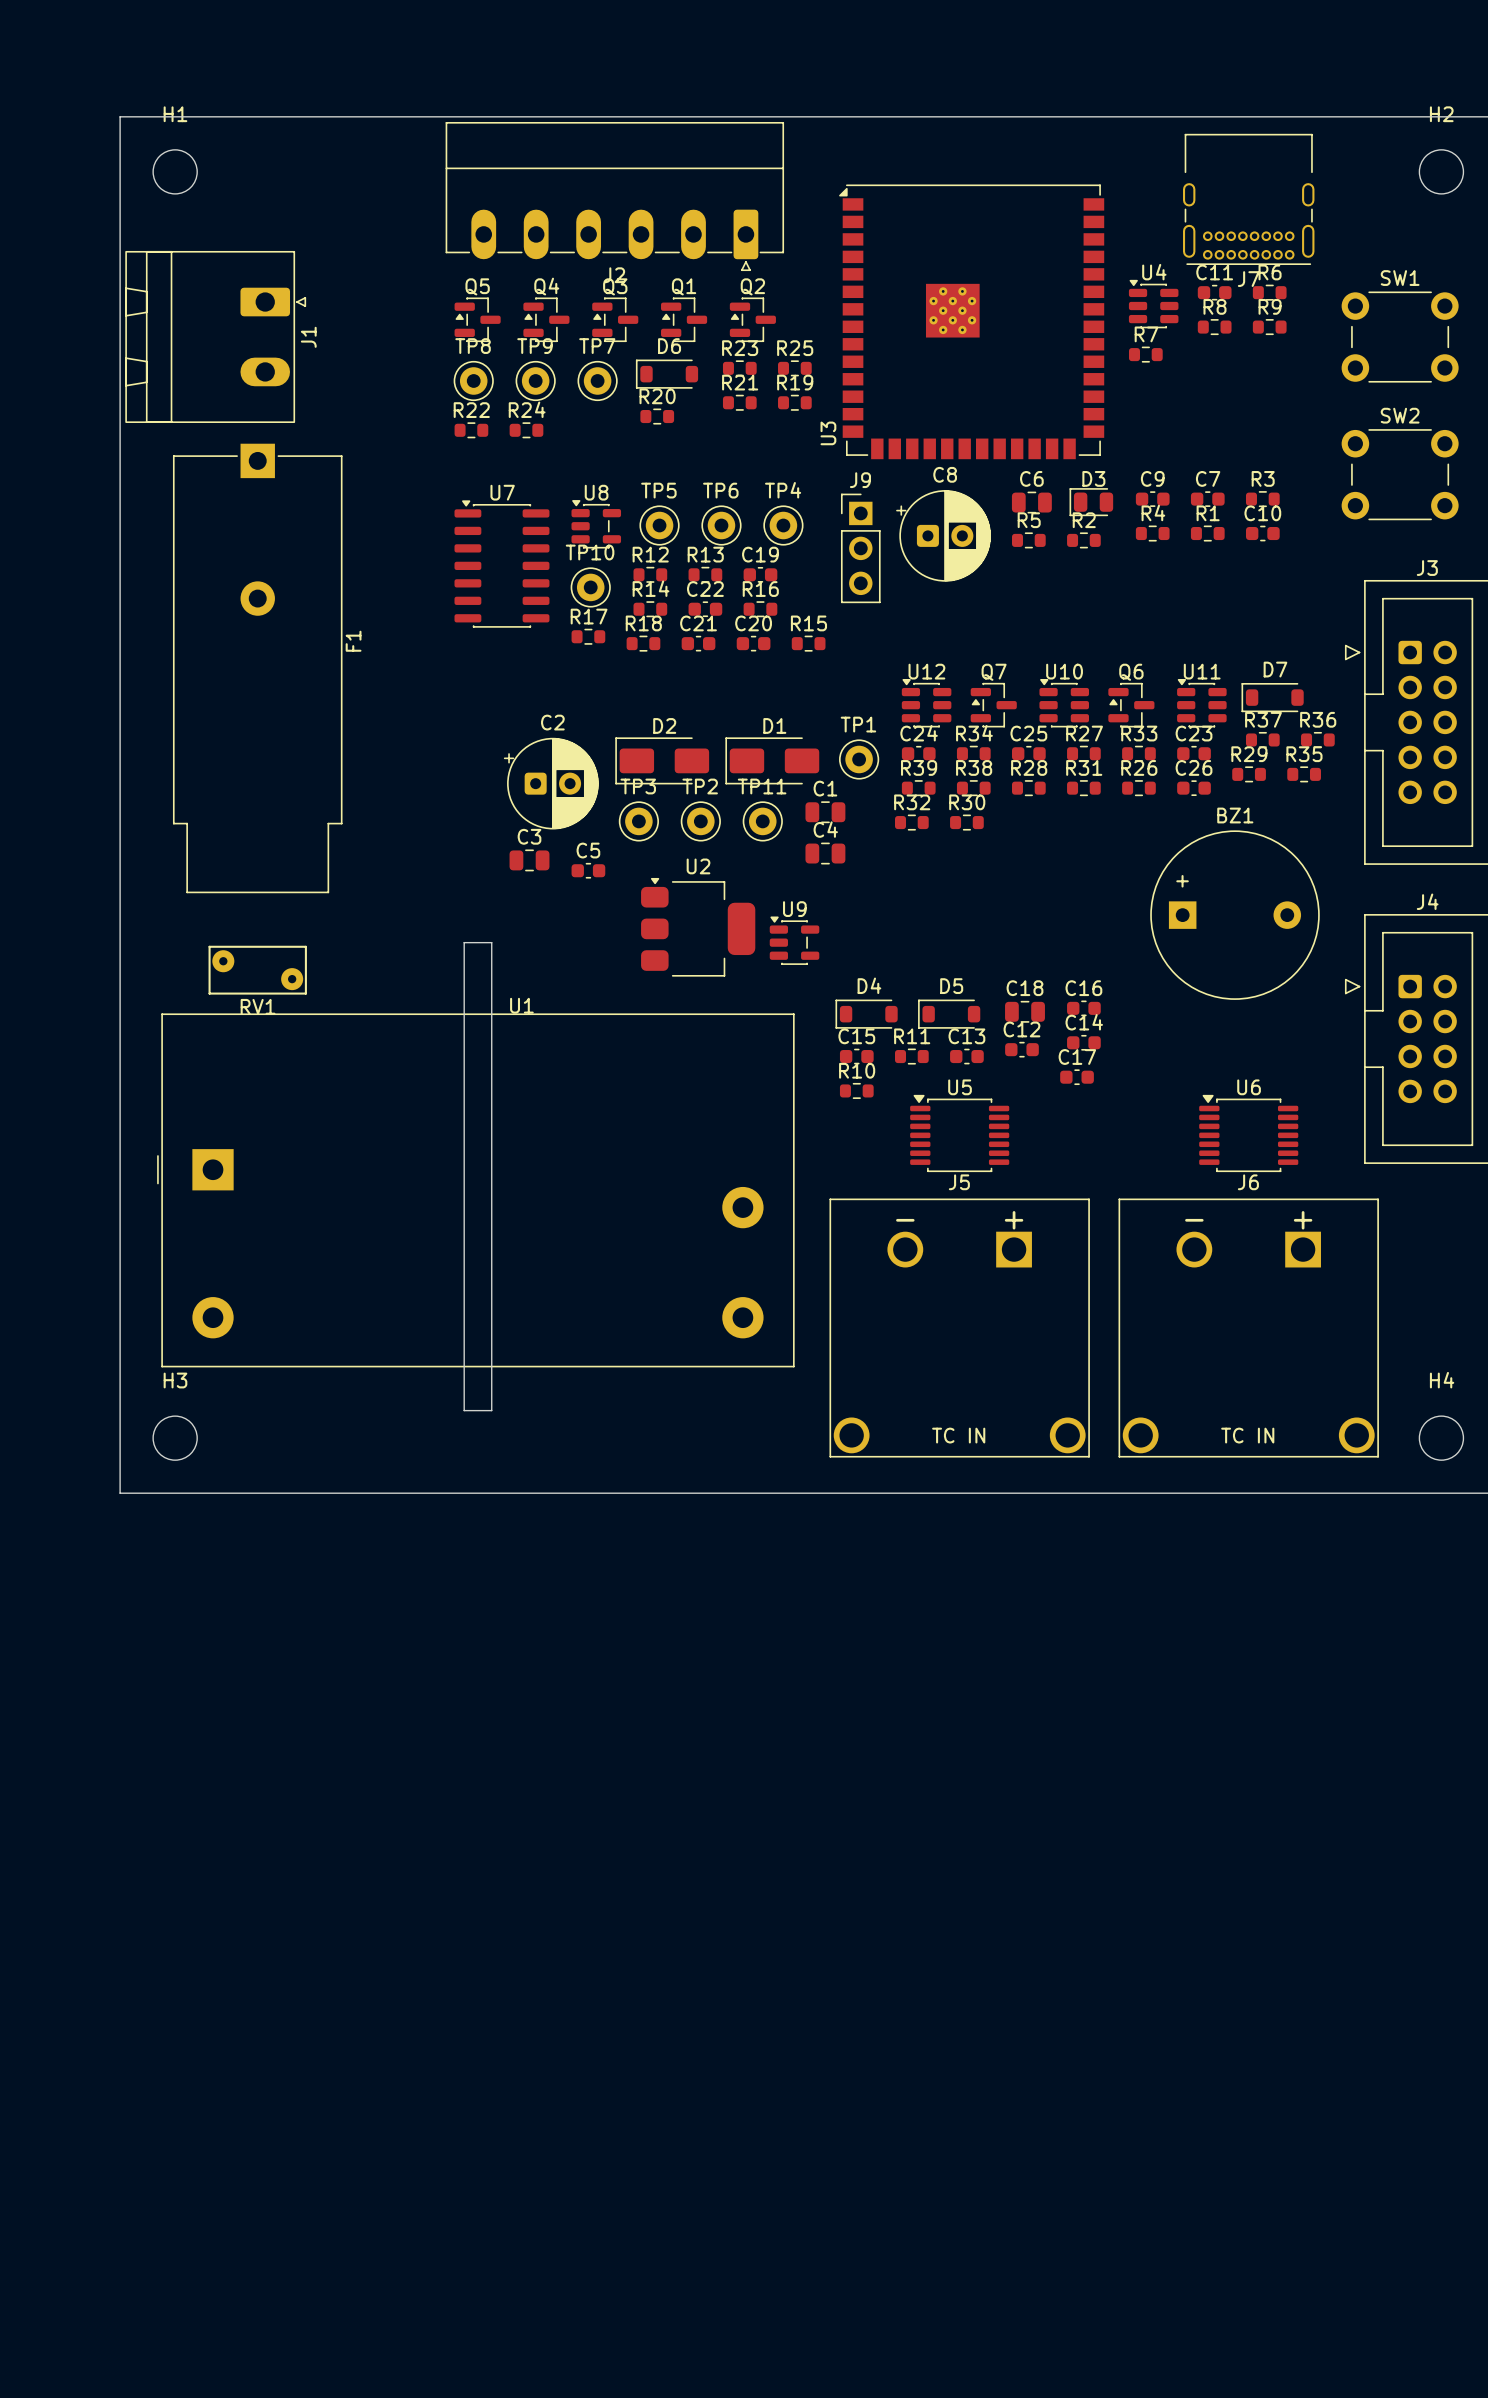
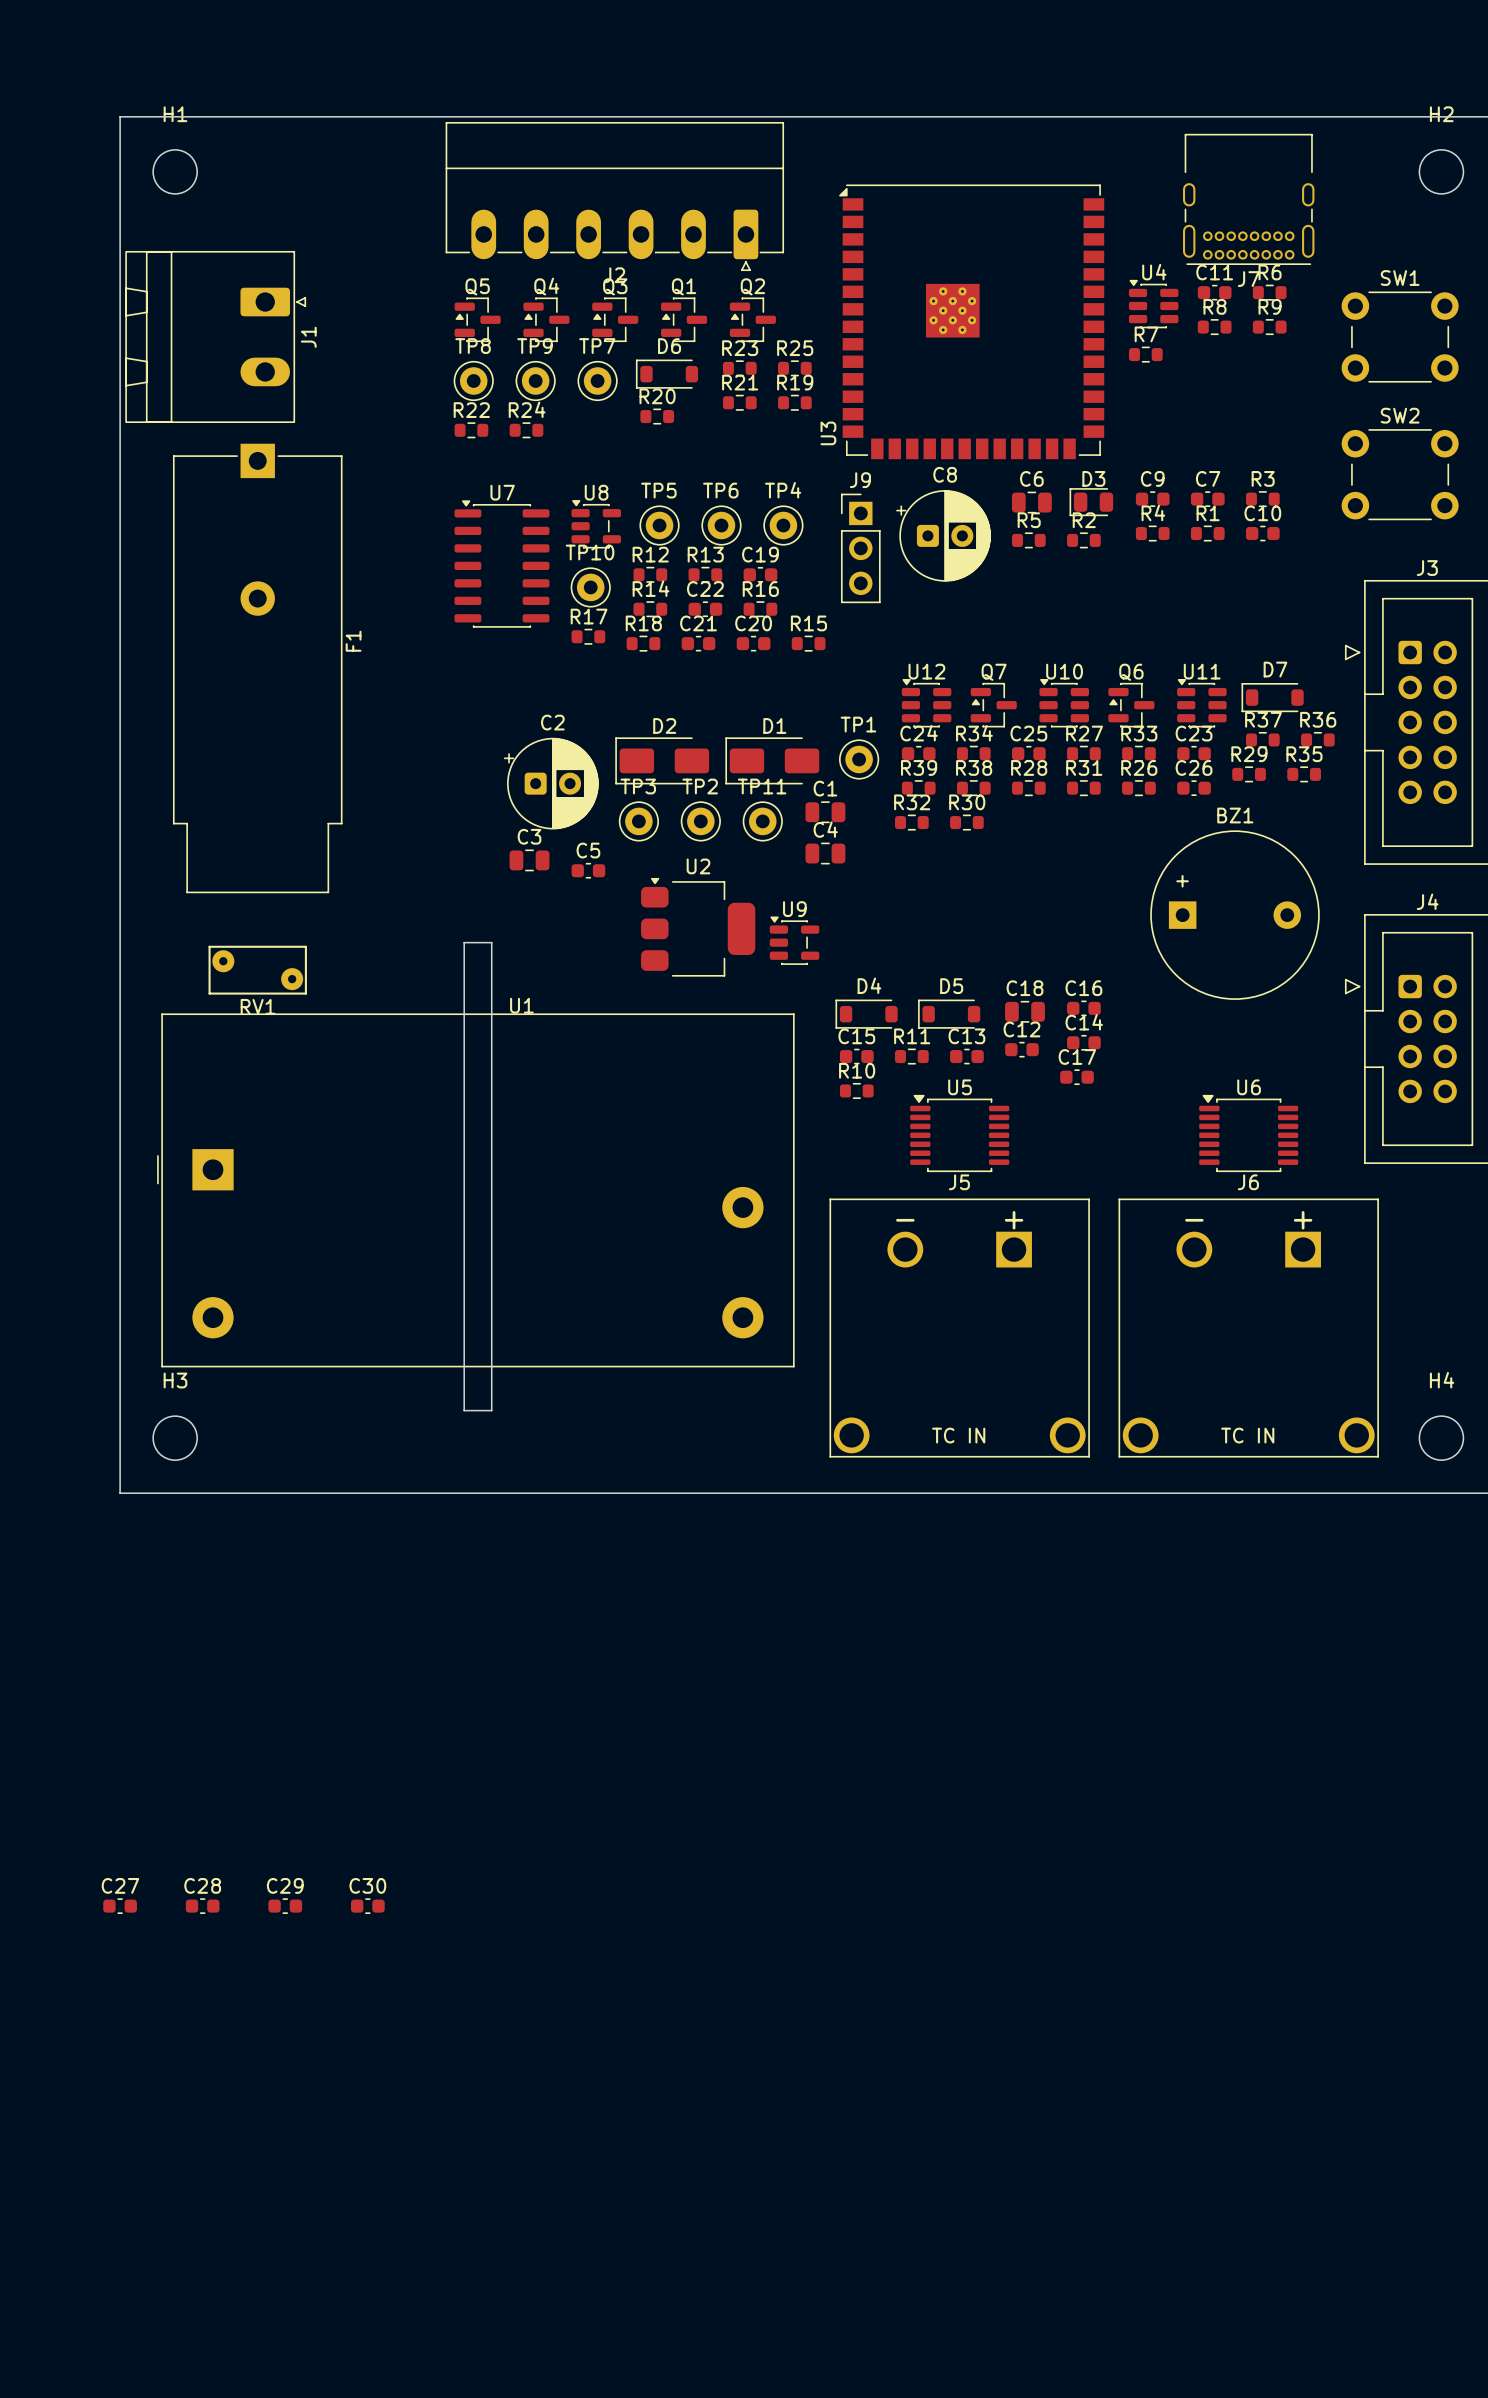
C27: none -> (120, 1906)
C28: none -> (202, 1906)
C29: none -> (285, 1906)
C30: none -> (367, 1906)

